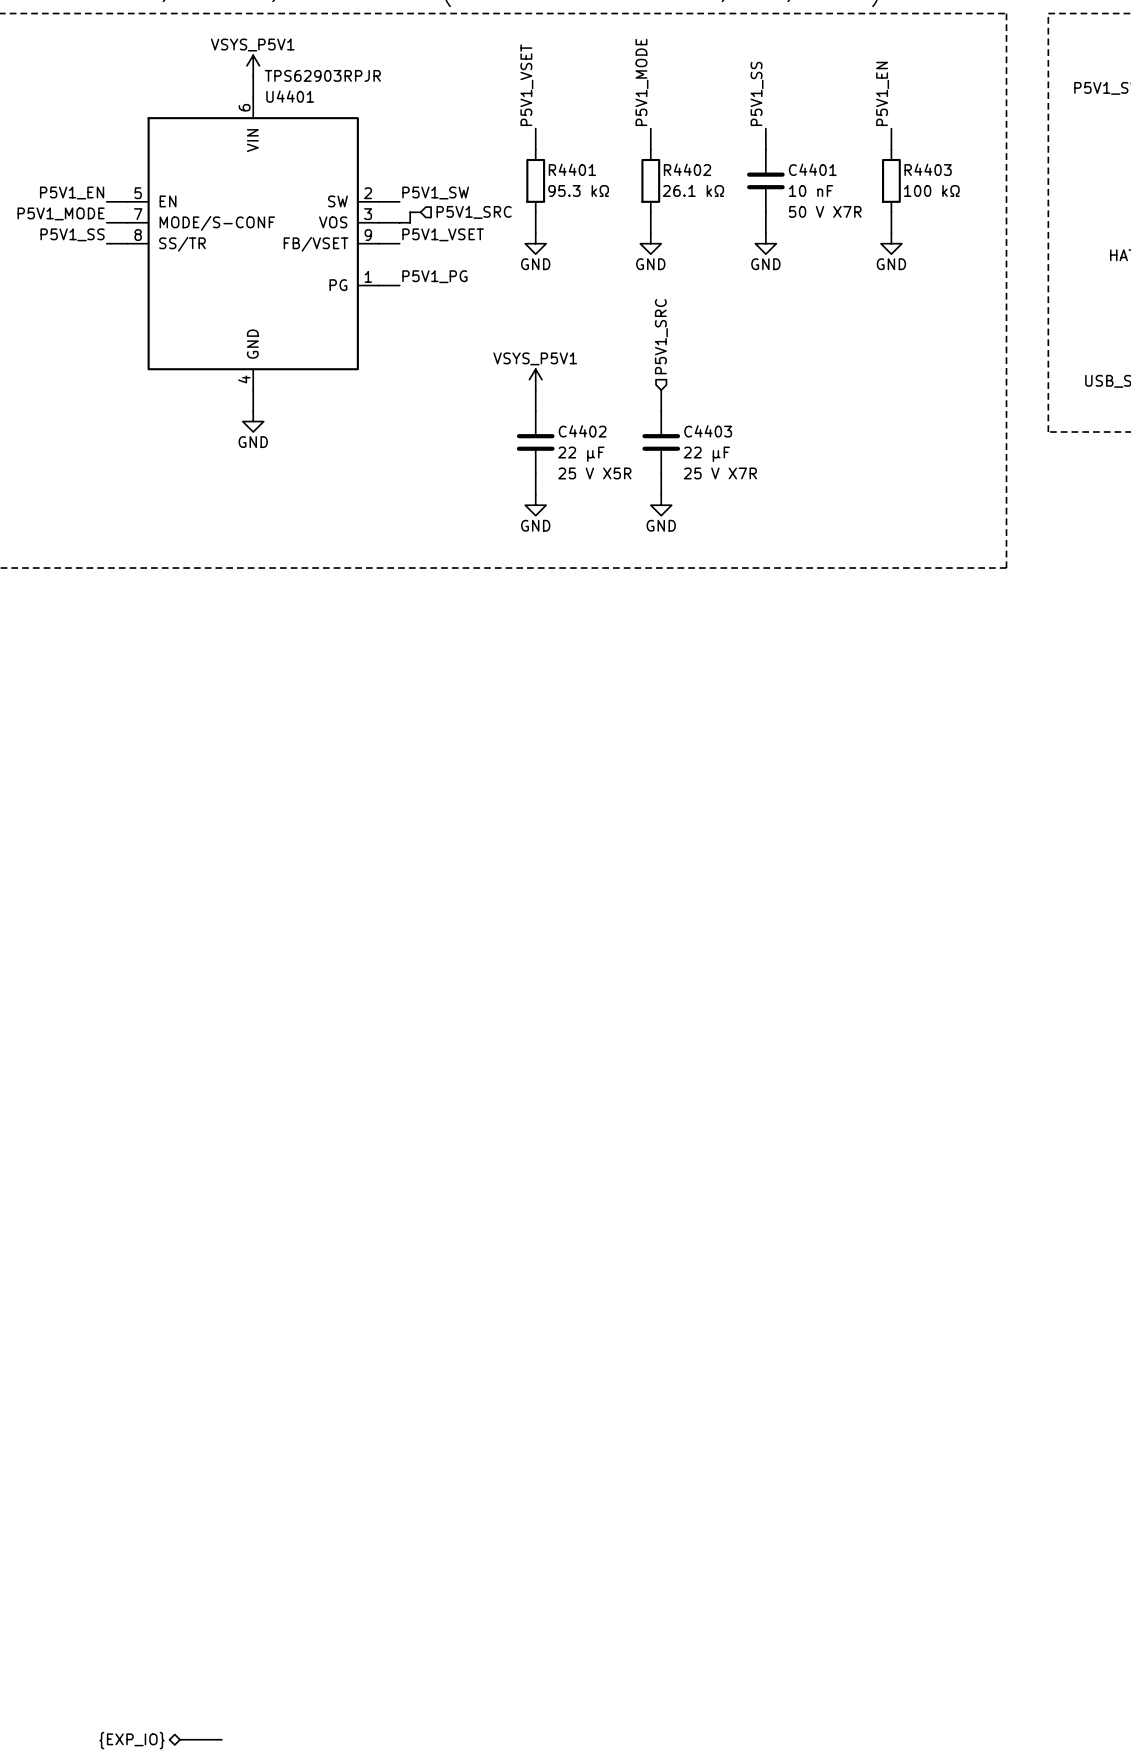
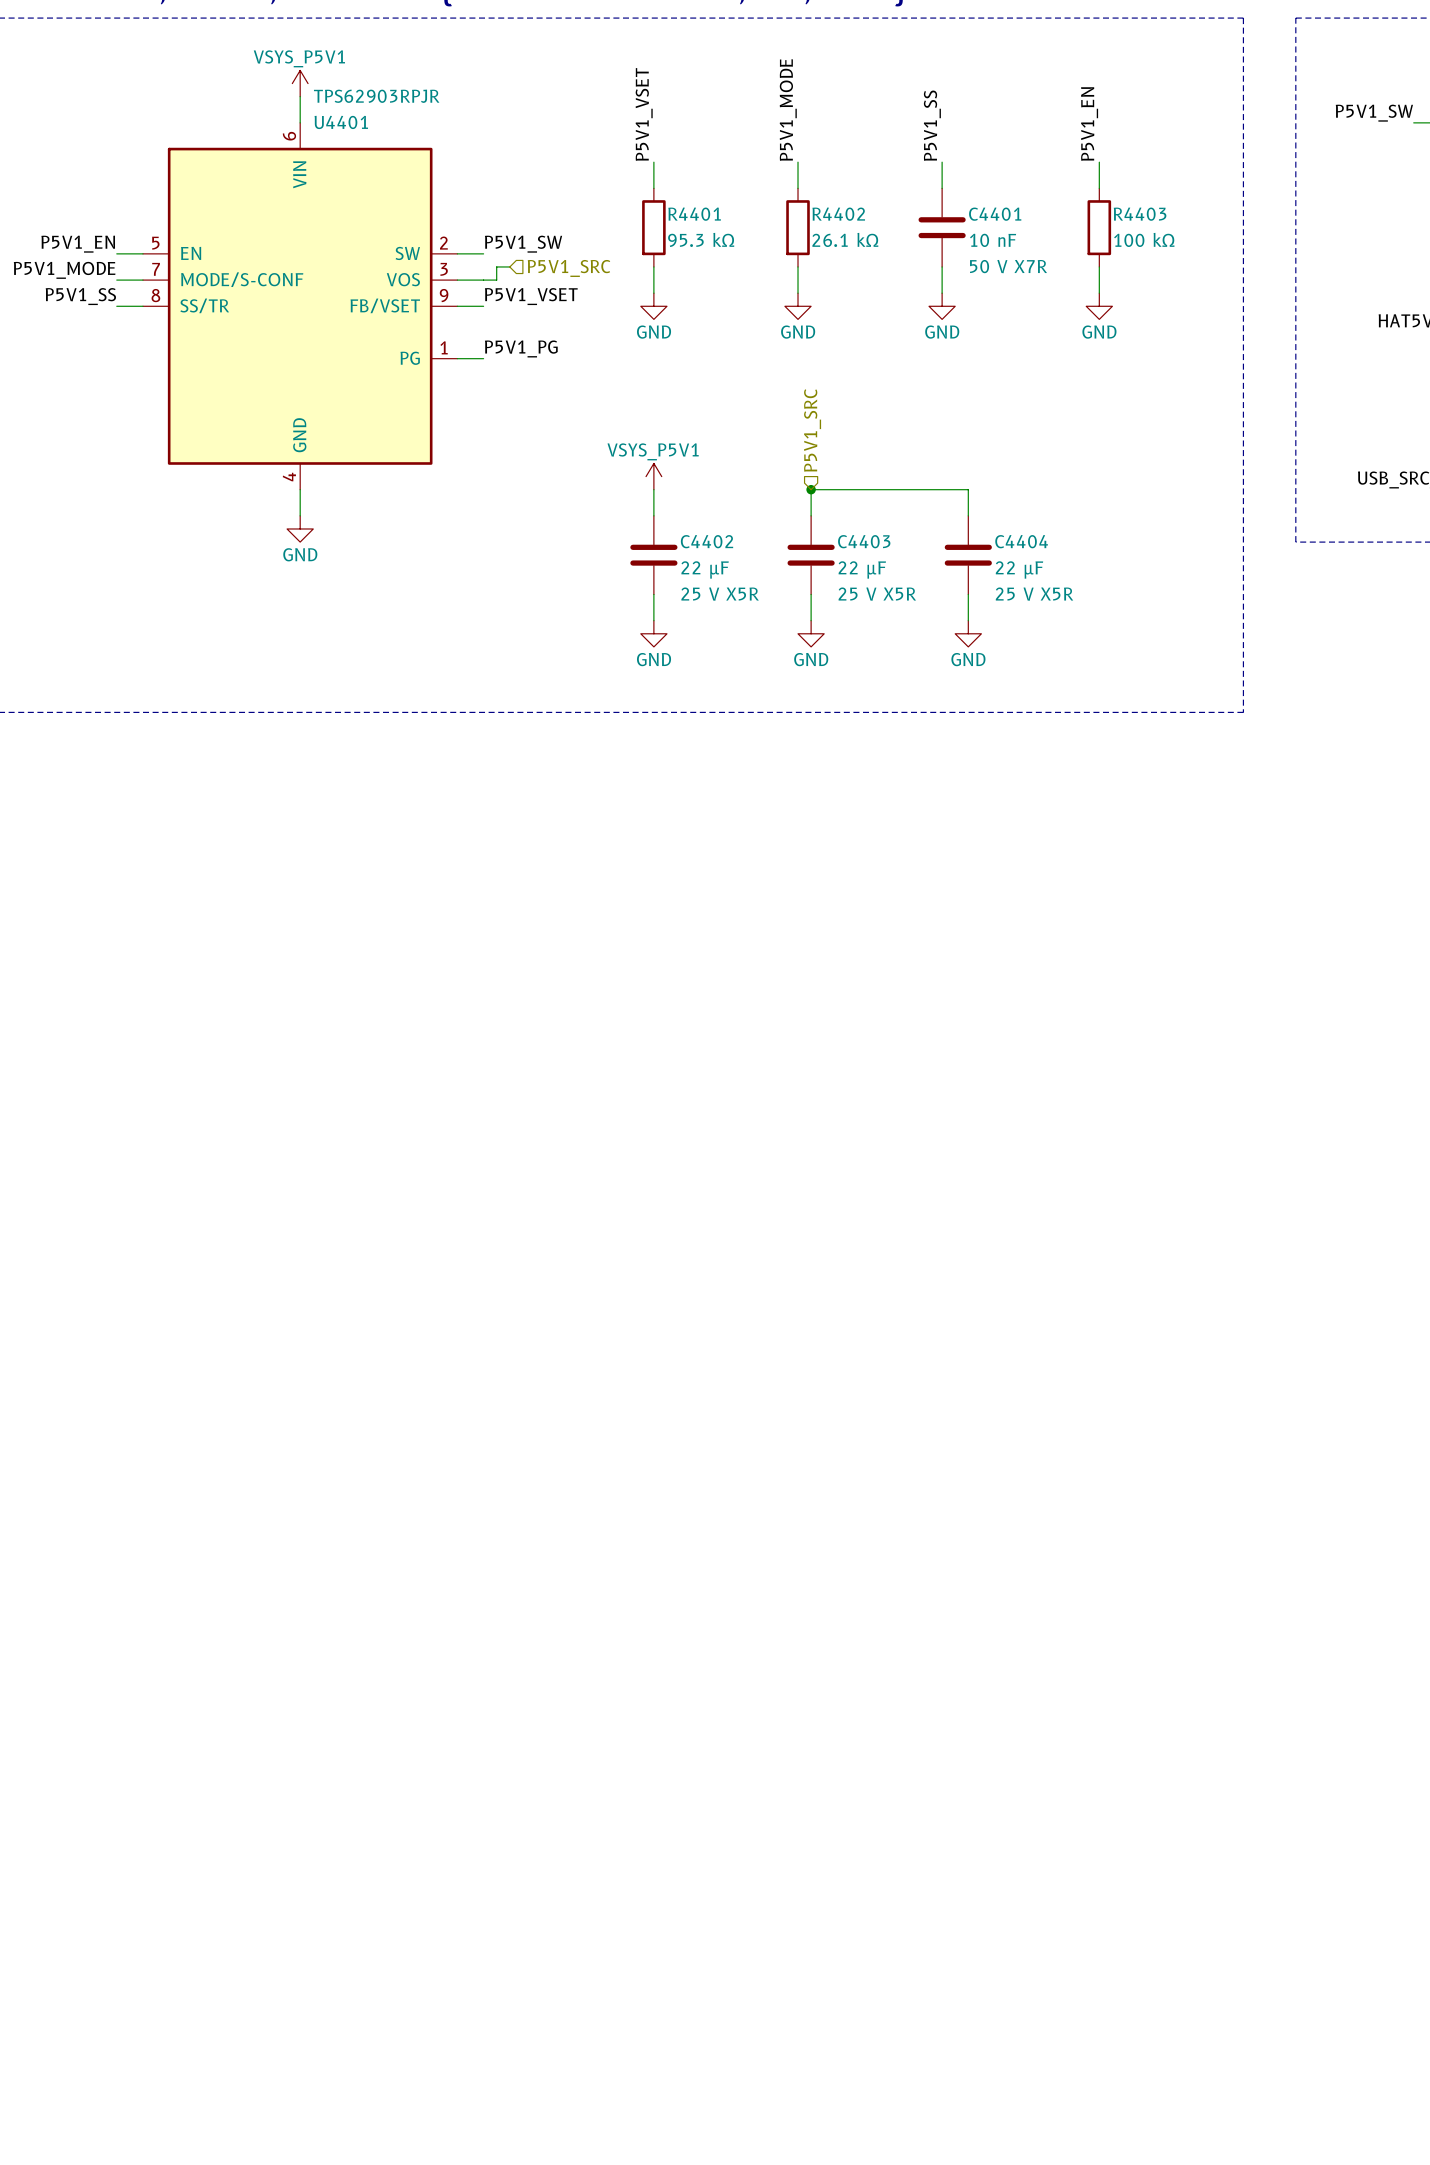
wire: none -> (811, 489) (968, 489) (968, 515)
junction: none -> (811, 489)
C4404: none -> 22 µF (968, 555)
C4403 text: 25 V X7R (720, 473) -> 25 V X5R (877, 594)
wire: none -> (968, 594) (968, 620)
power symbol: none -> GND (968, 633)

